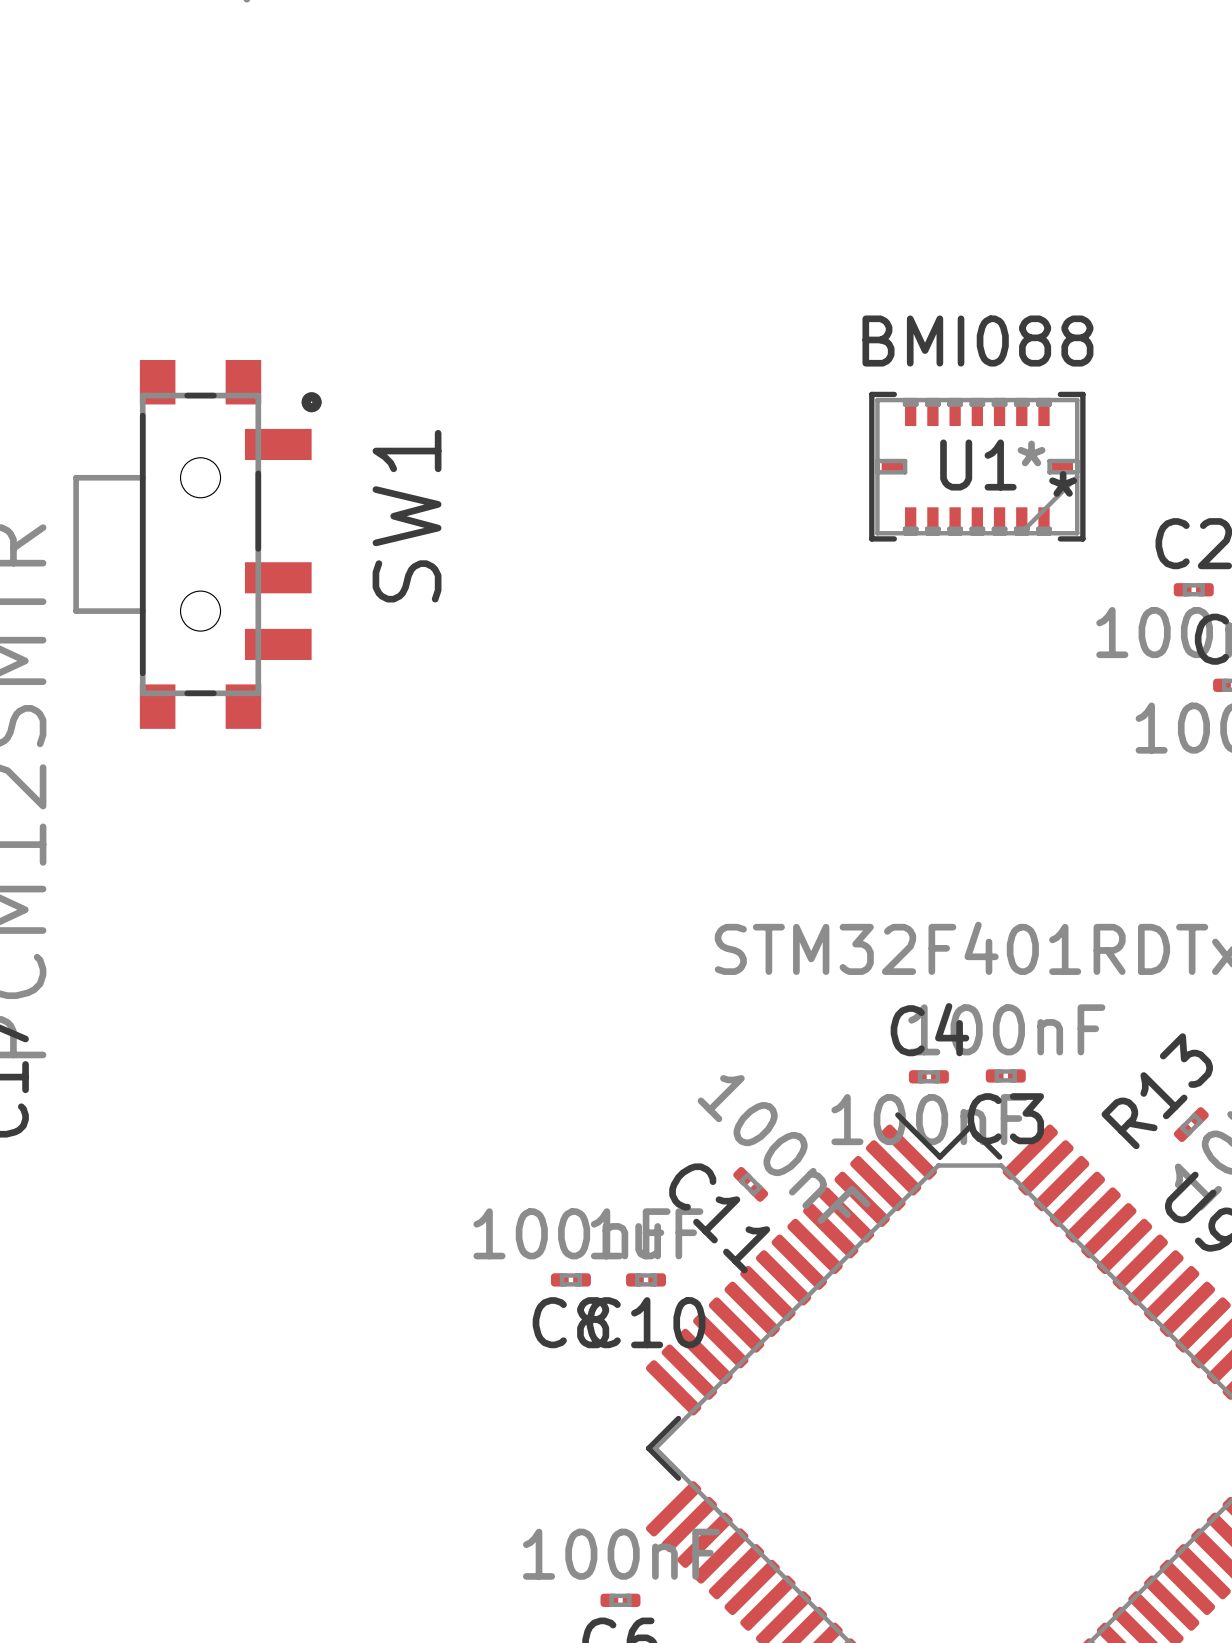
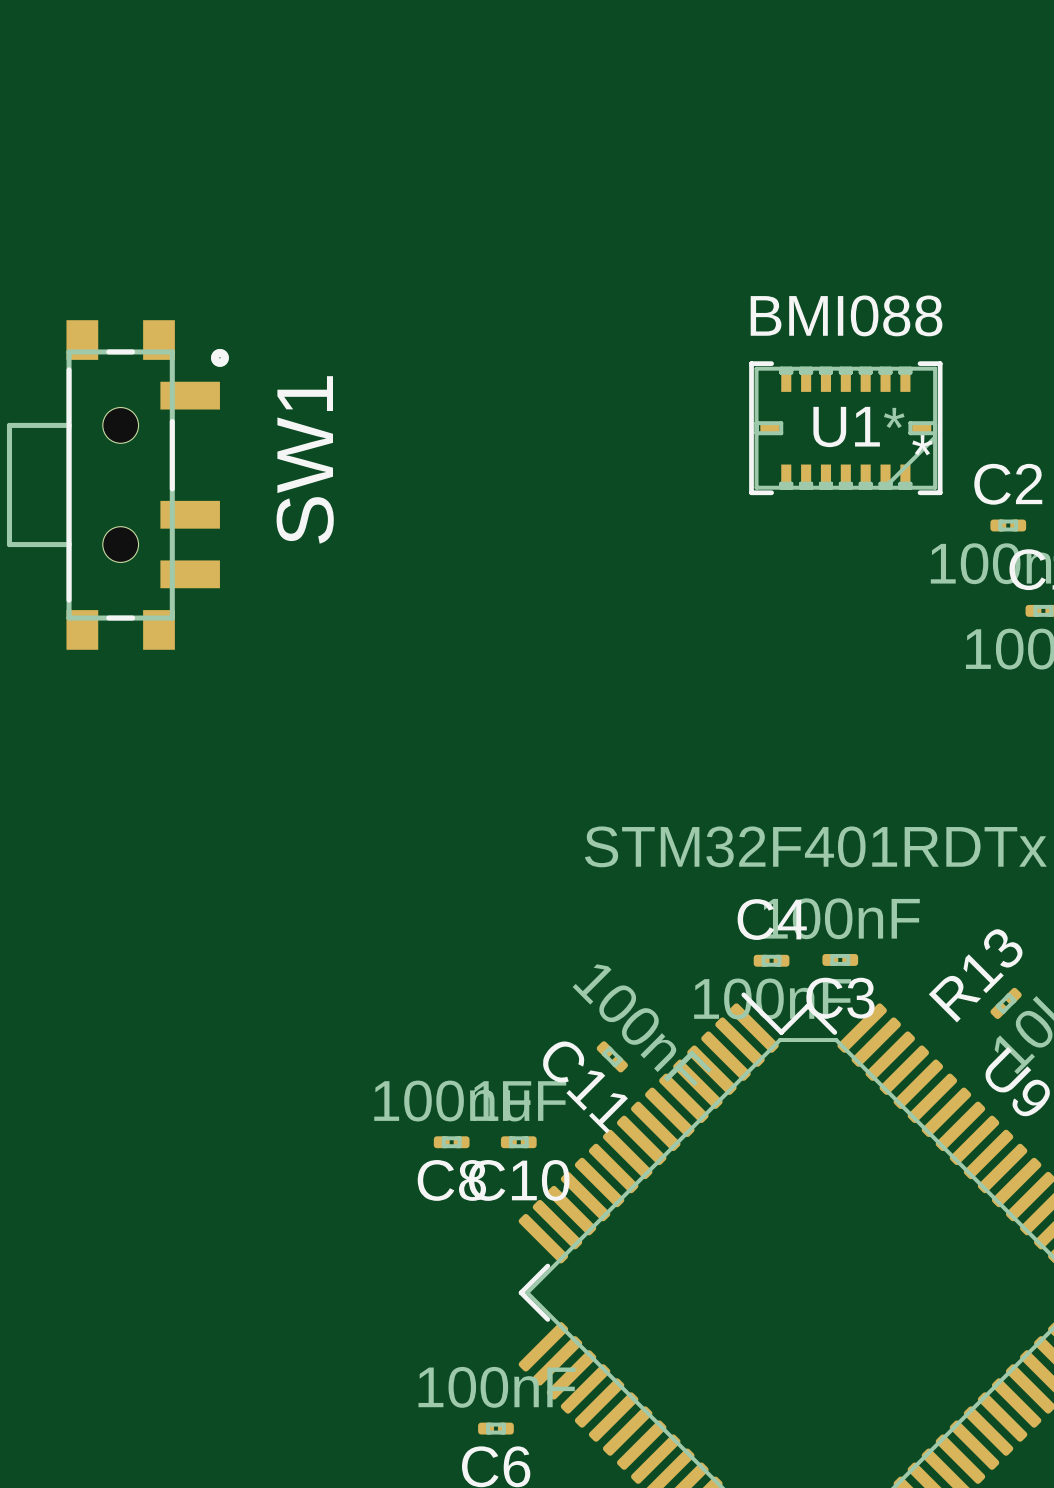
U1 position: (977, 466) -> (845, 428)

